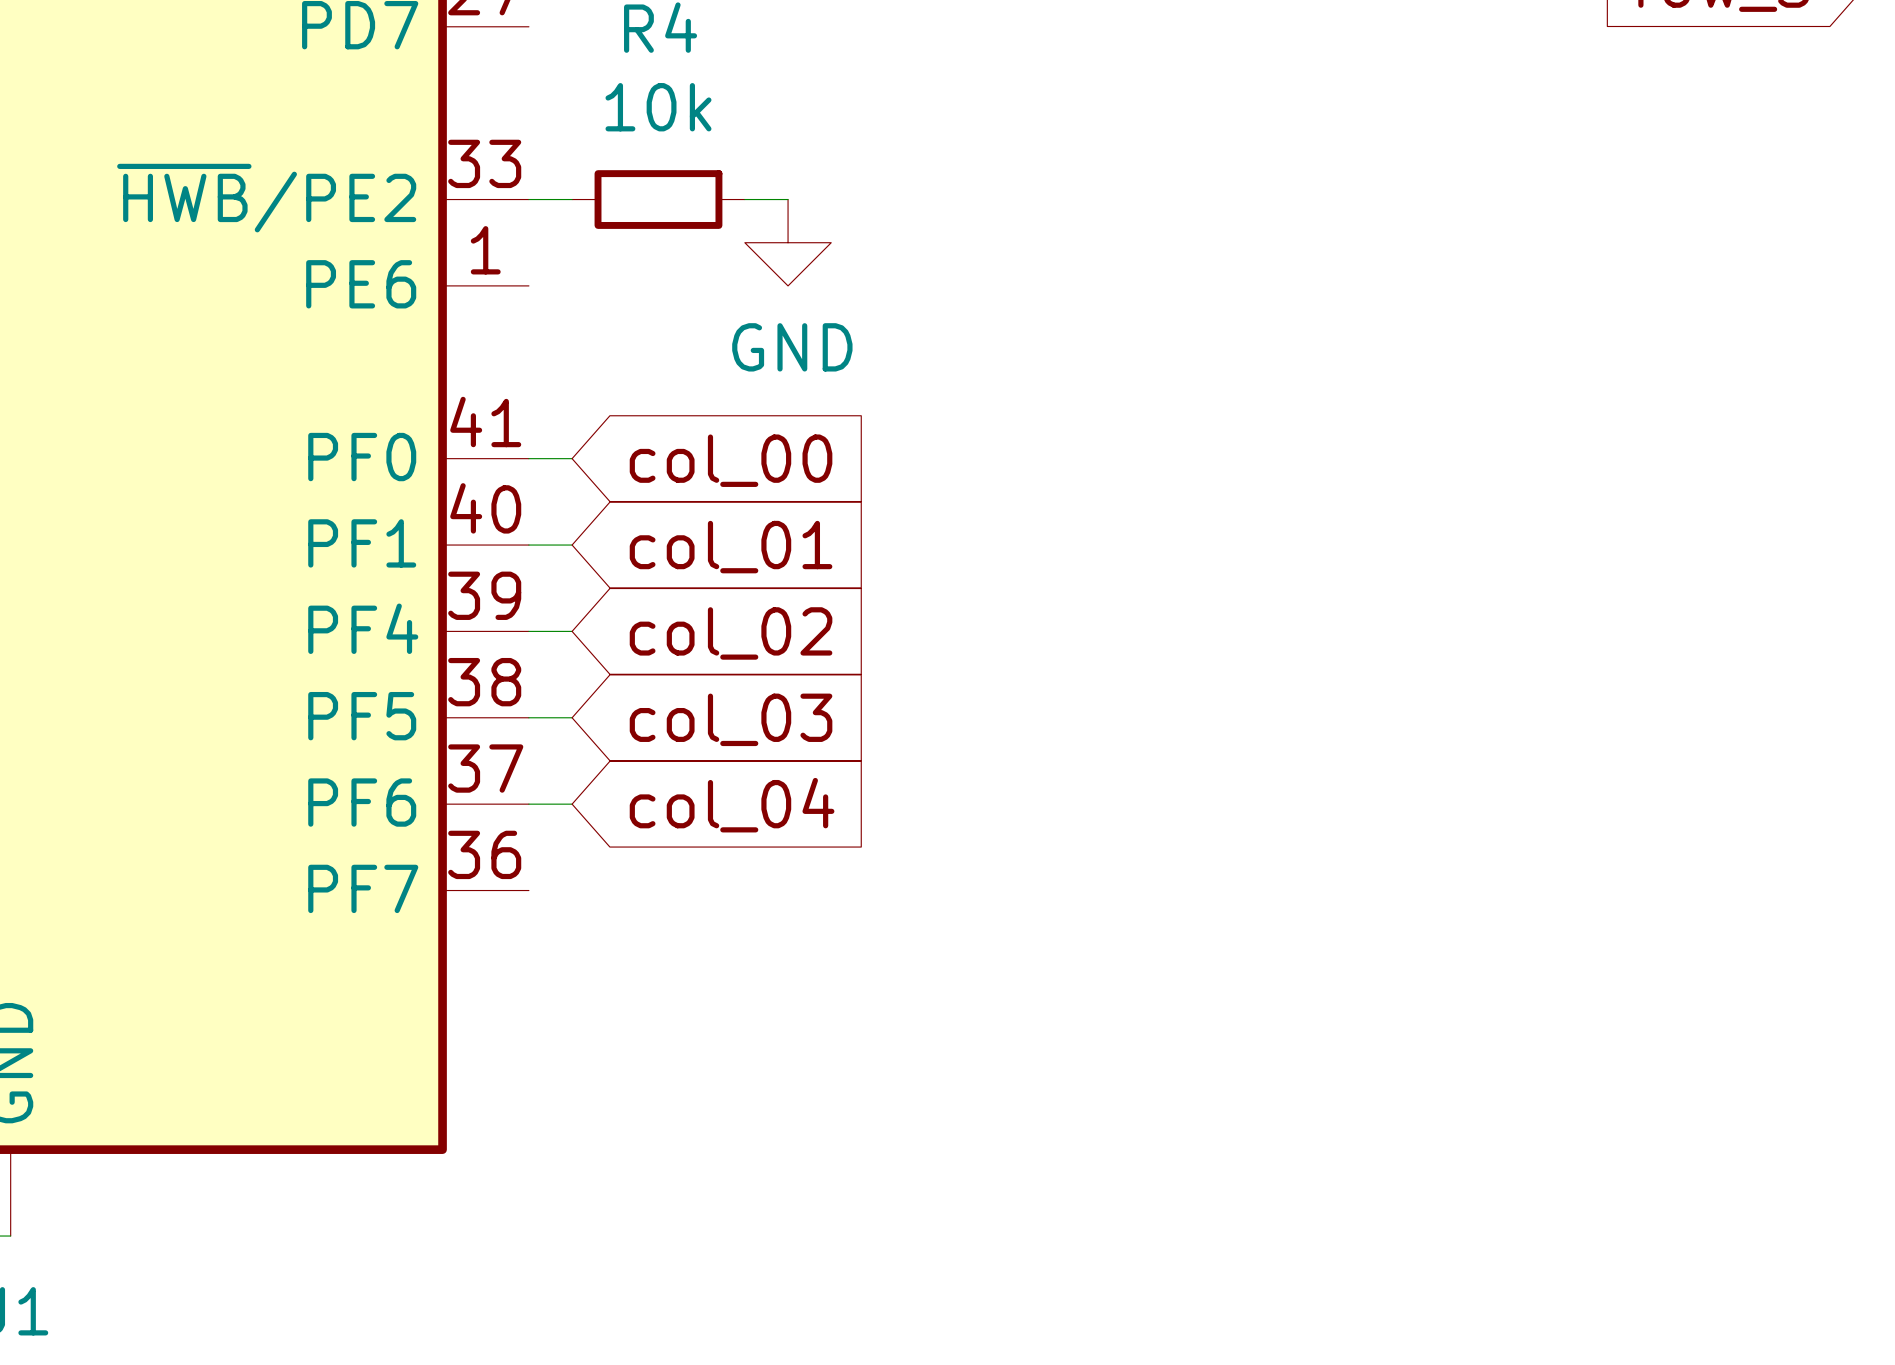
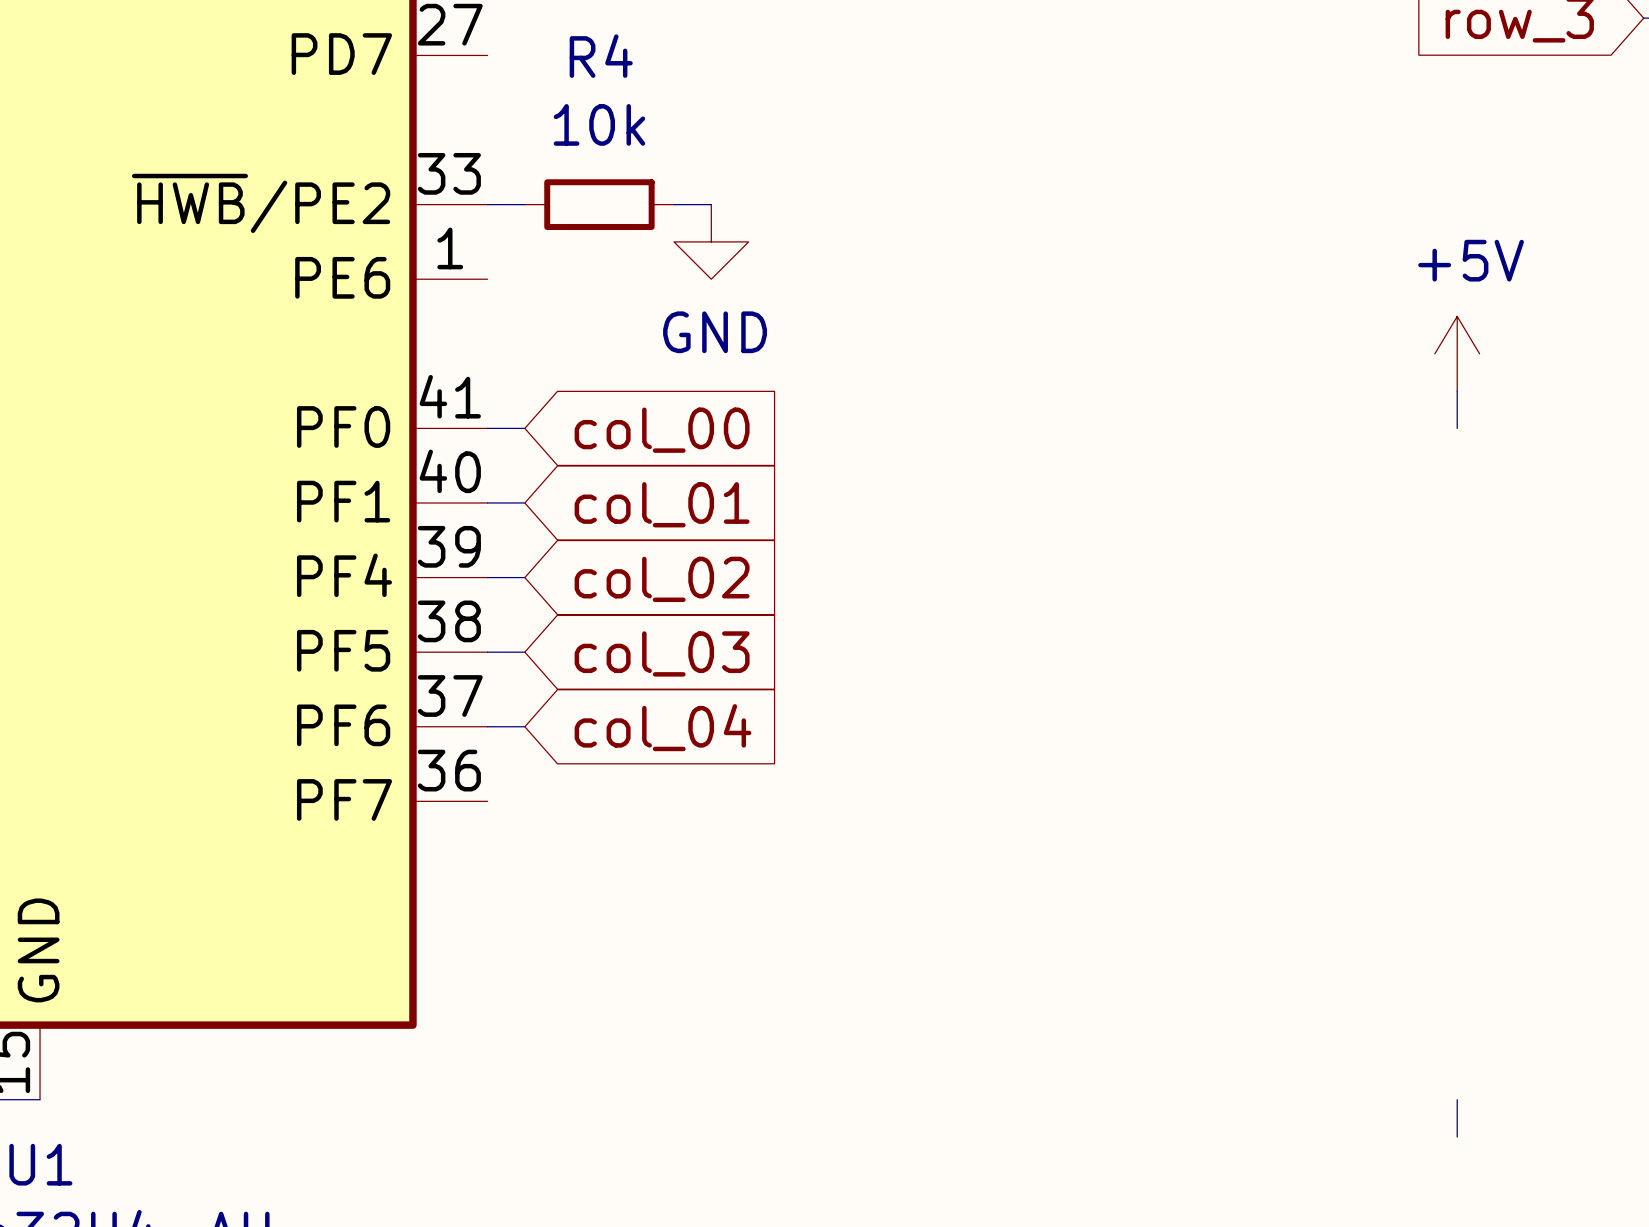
power symbol: none -> +5V (1457, 353)
wire: none -> (1457, 391) (1457, 428)
wire: none -> (1457, 1099) (1457, 1137)

